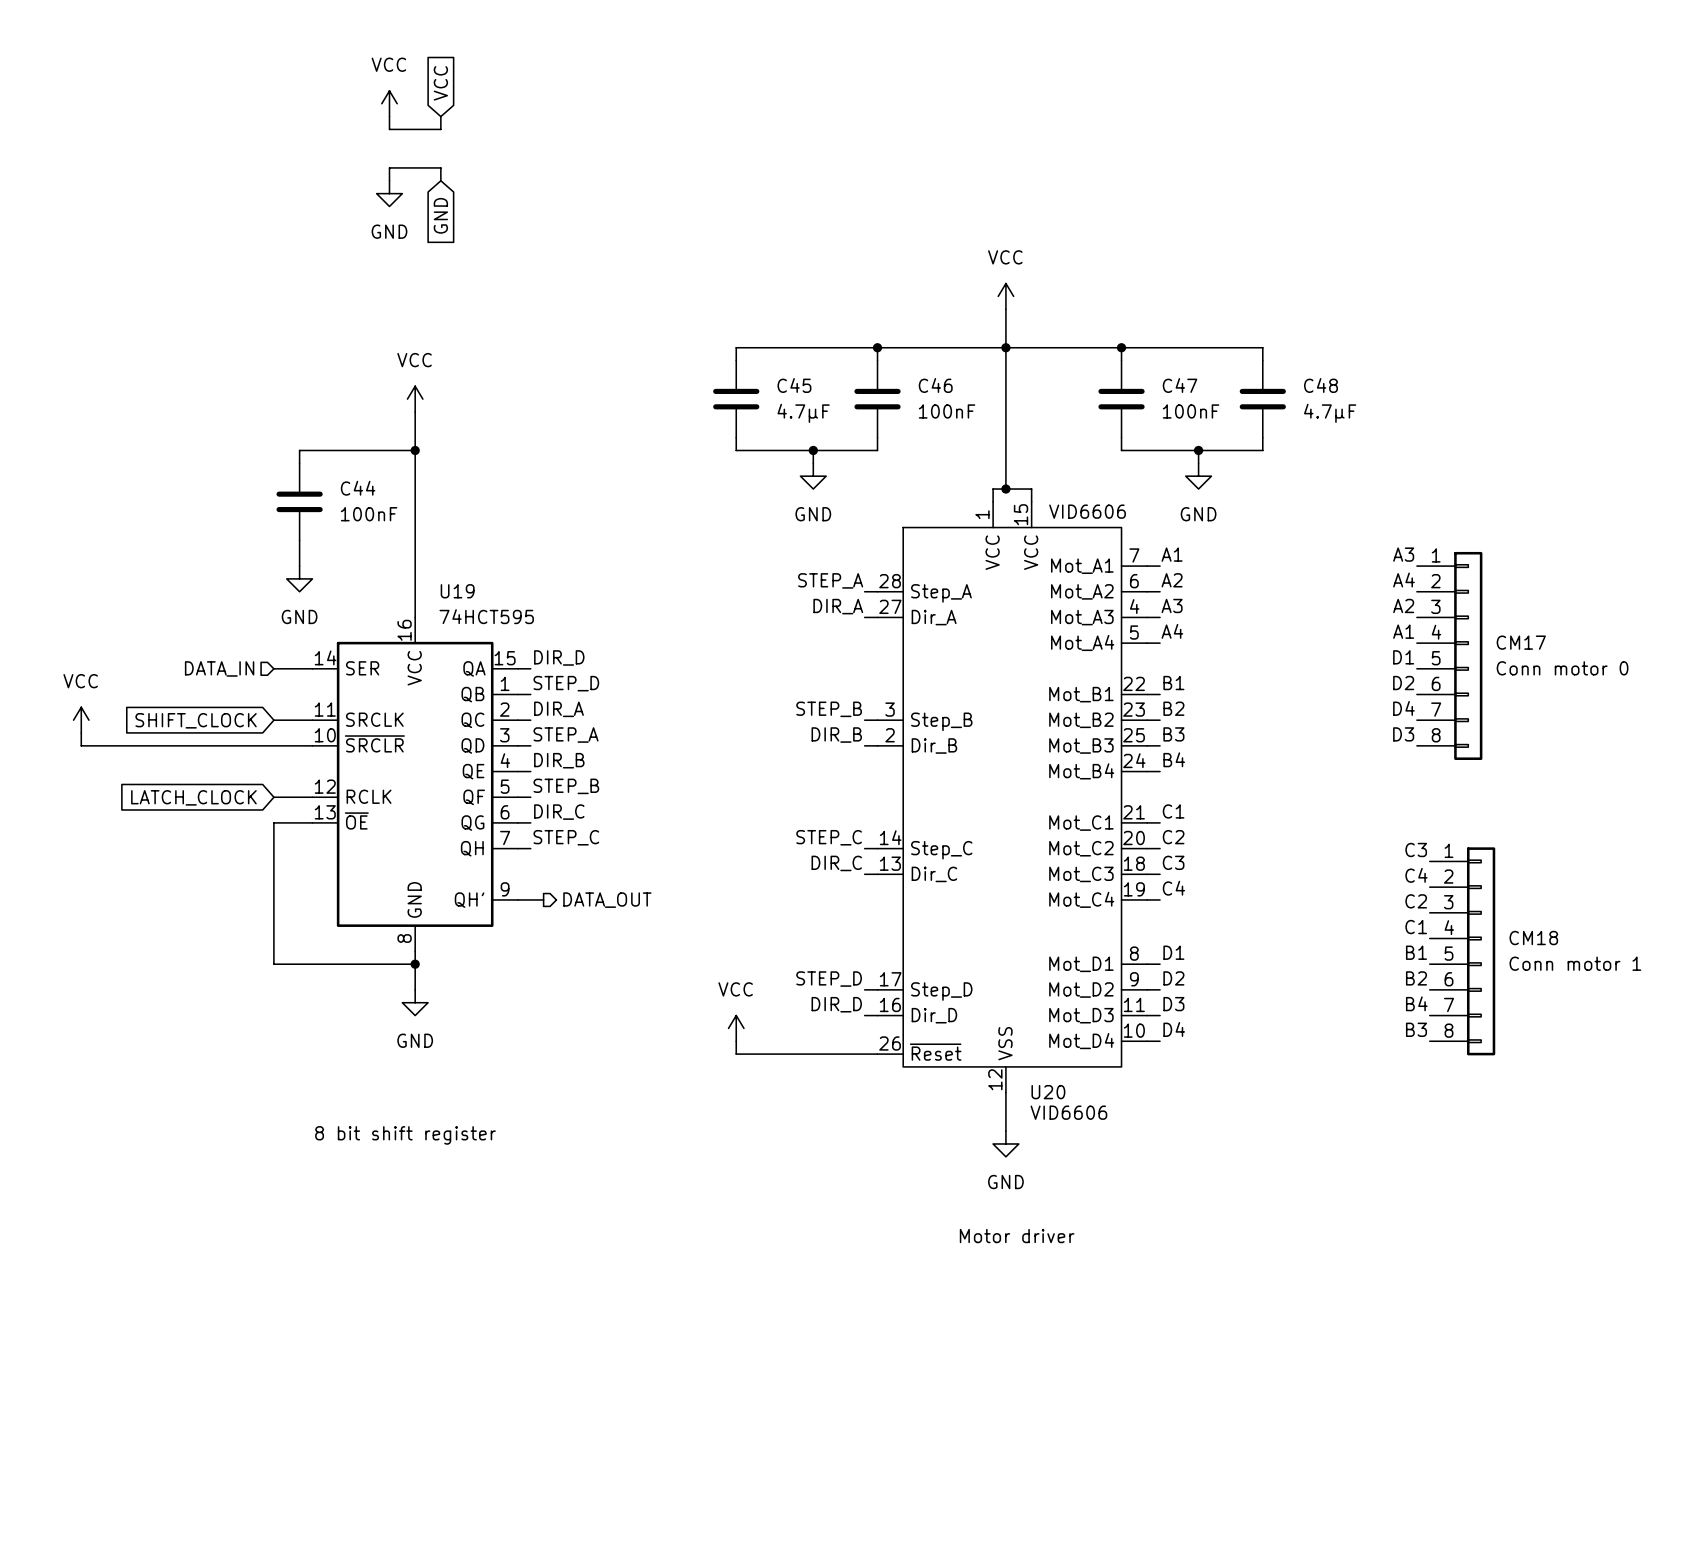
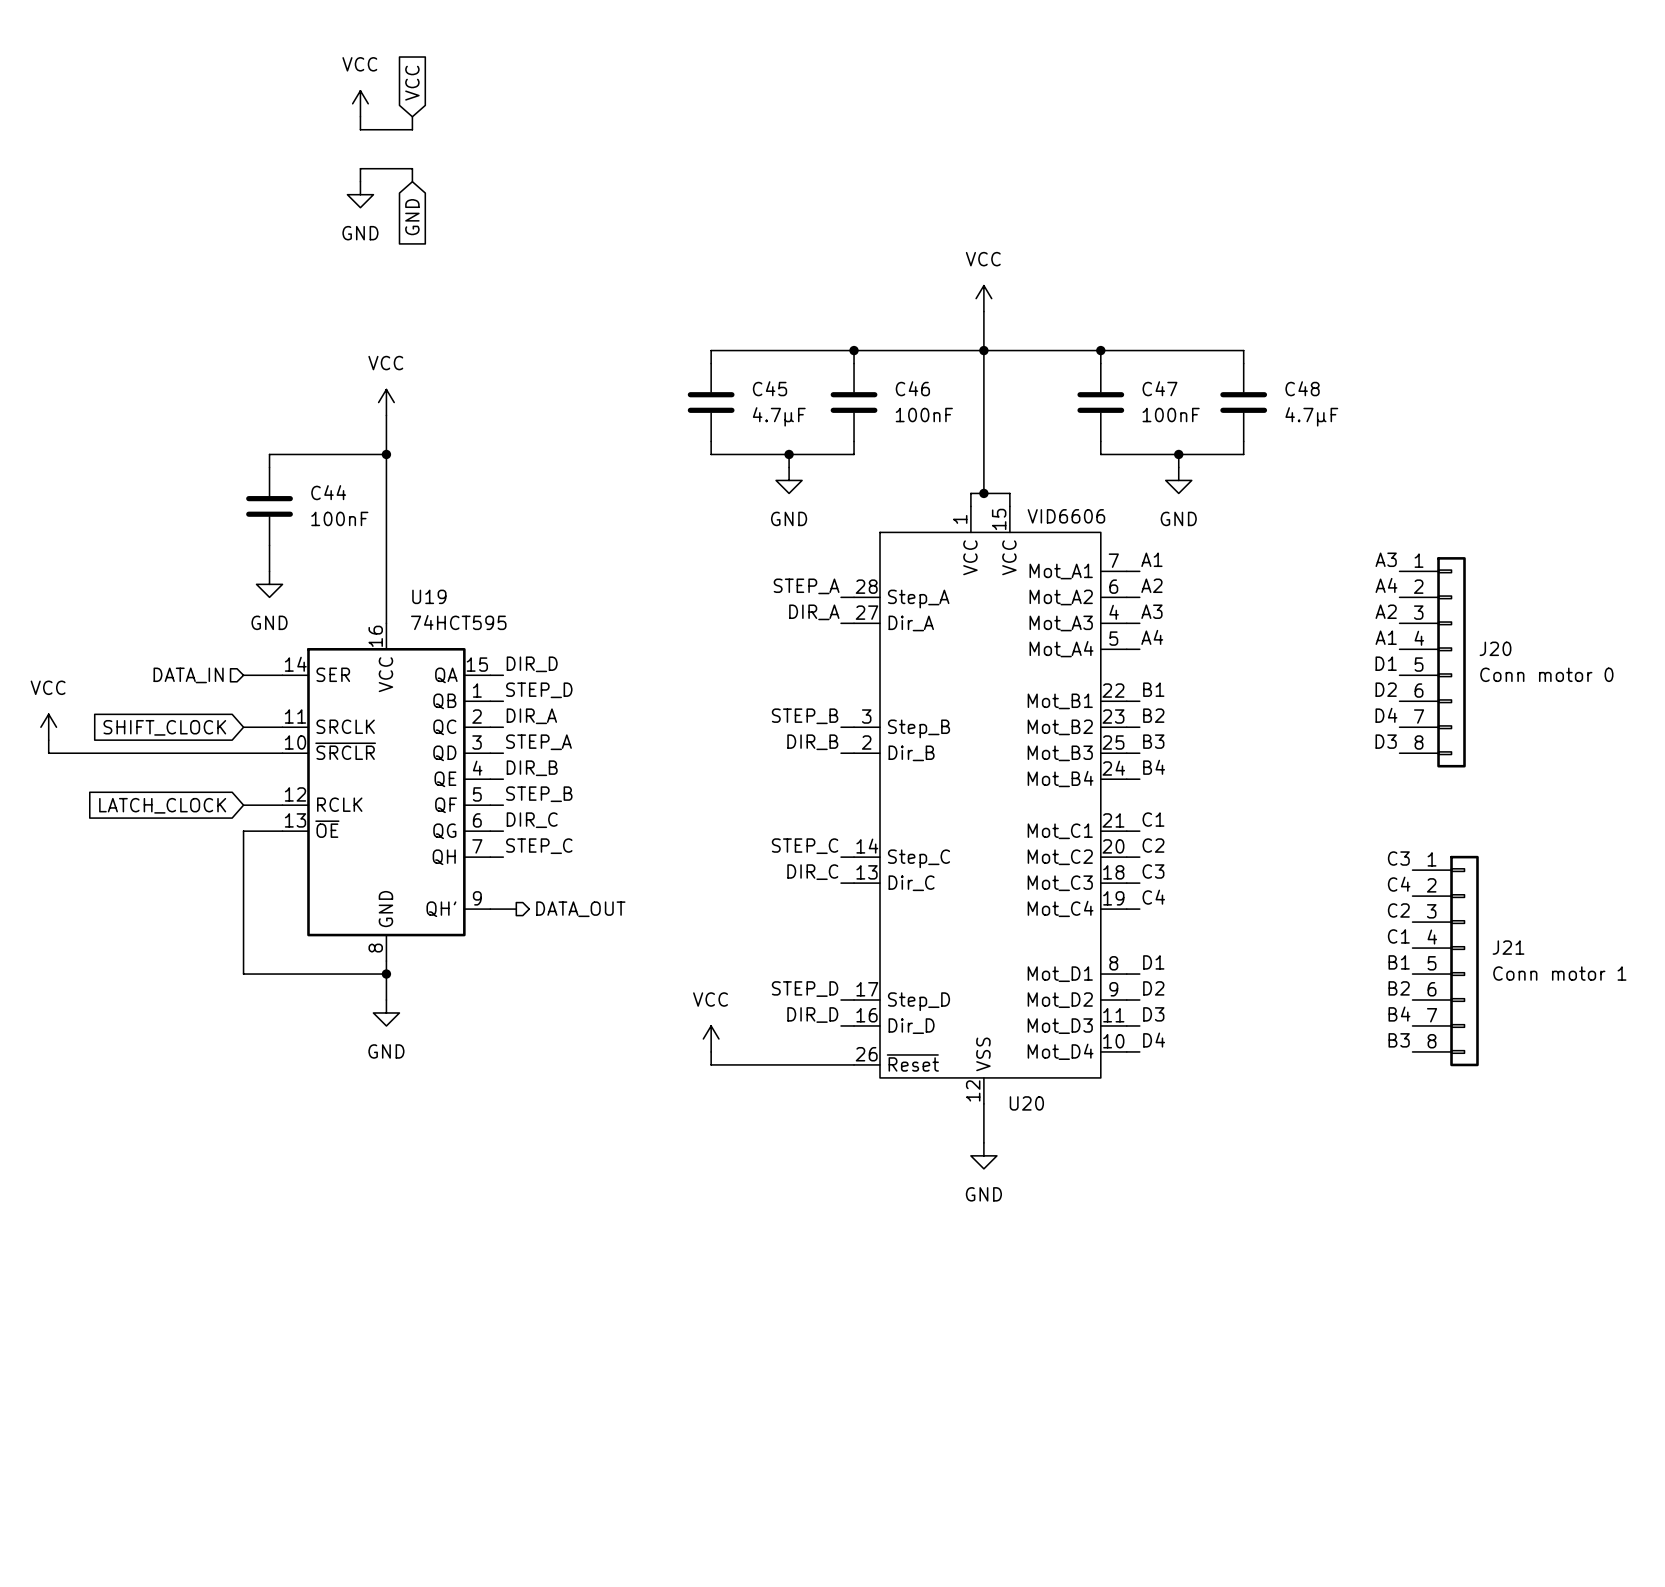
CM17 name: CM17 (1521, 642) -> J20 (1495, 648)
CM18 name: CM18 (1533, 938) -> J21 (1508, 947)
U20 value: VID6606 (1068, 1112) -> none
text: 8 bit shift register (405, 1135) -> none
text: Motor driver (1017, 1236) -> none

